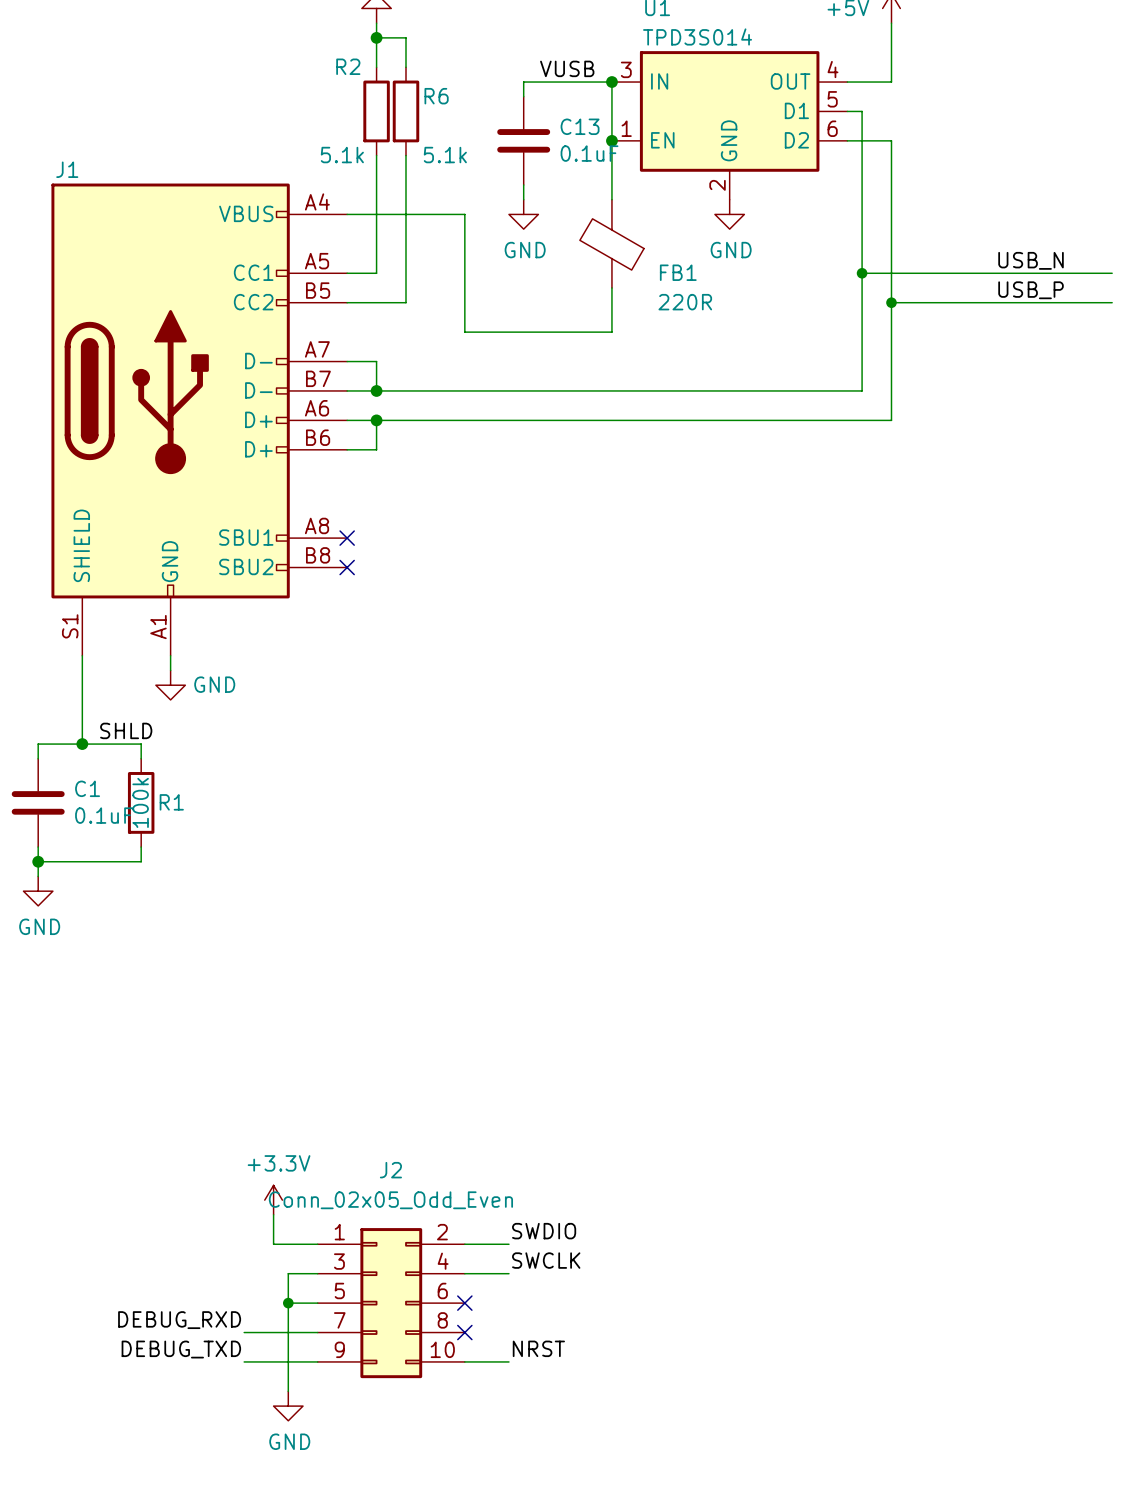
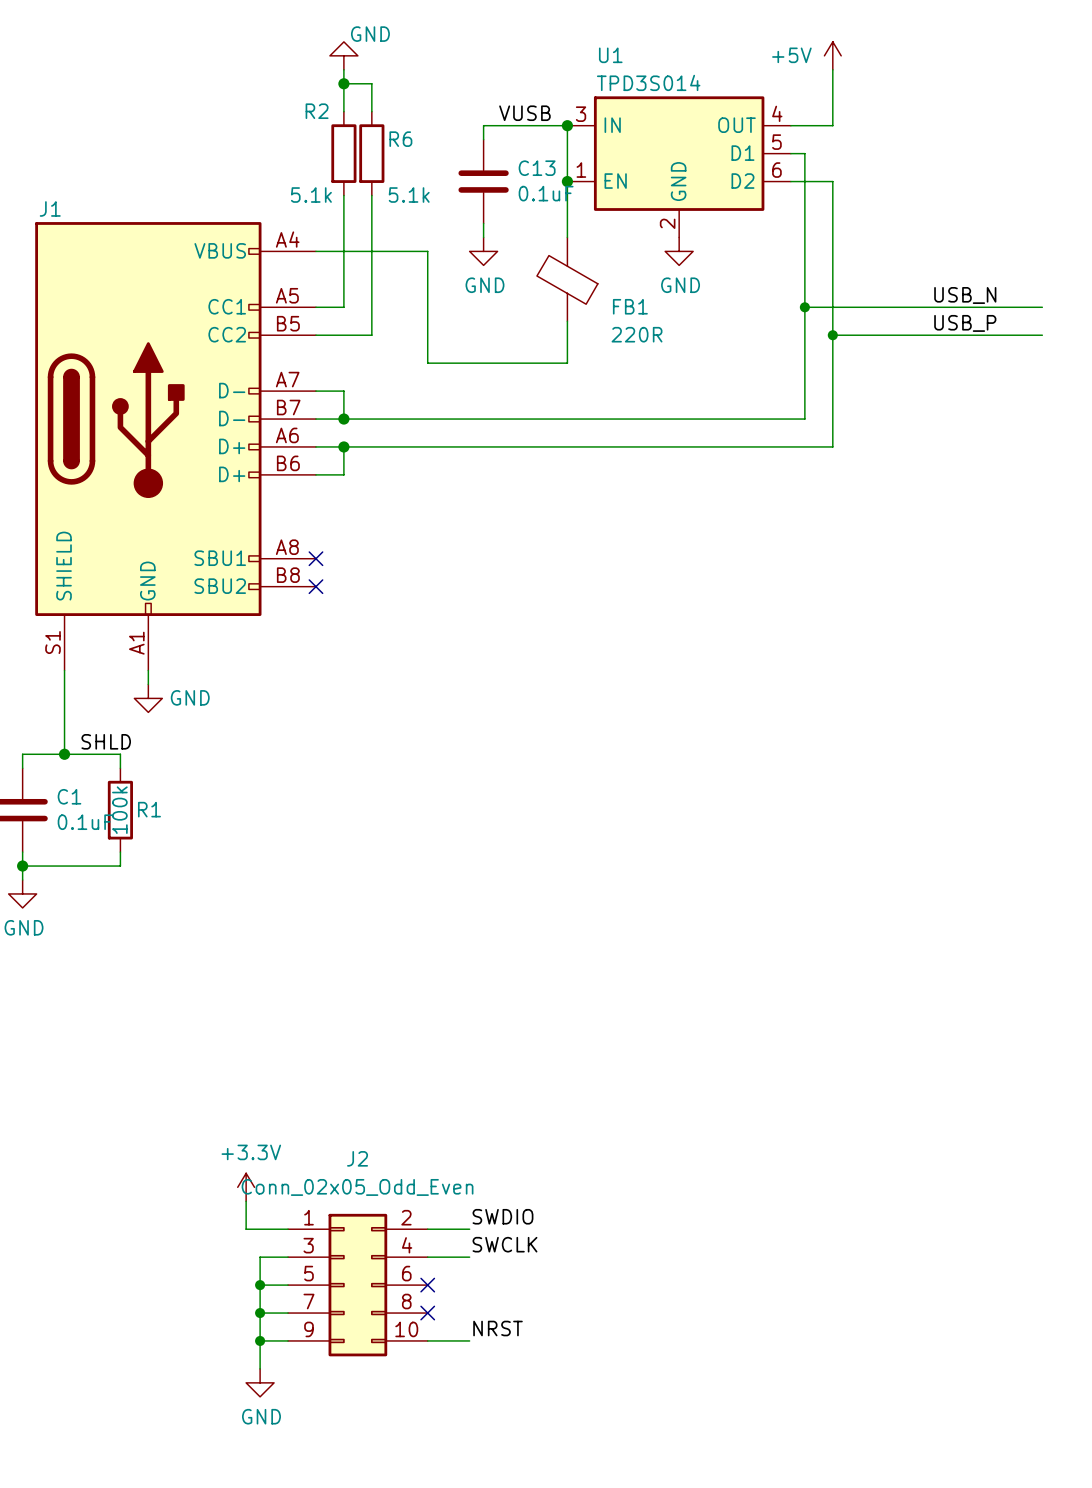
label: DEBUG_RXD (179, 1320) -> none
wire: (244, 1332) (288, 1332) -> none
junction: none -> (260, 1313)
label: DEBUG_TXD (181, 1349) -> none
wire: (244, 1361) (288, 1361) -> none
junction: none -> (260, 1340)

